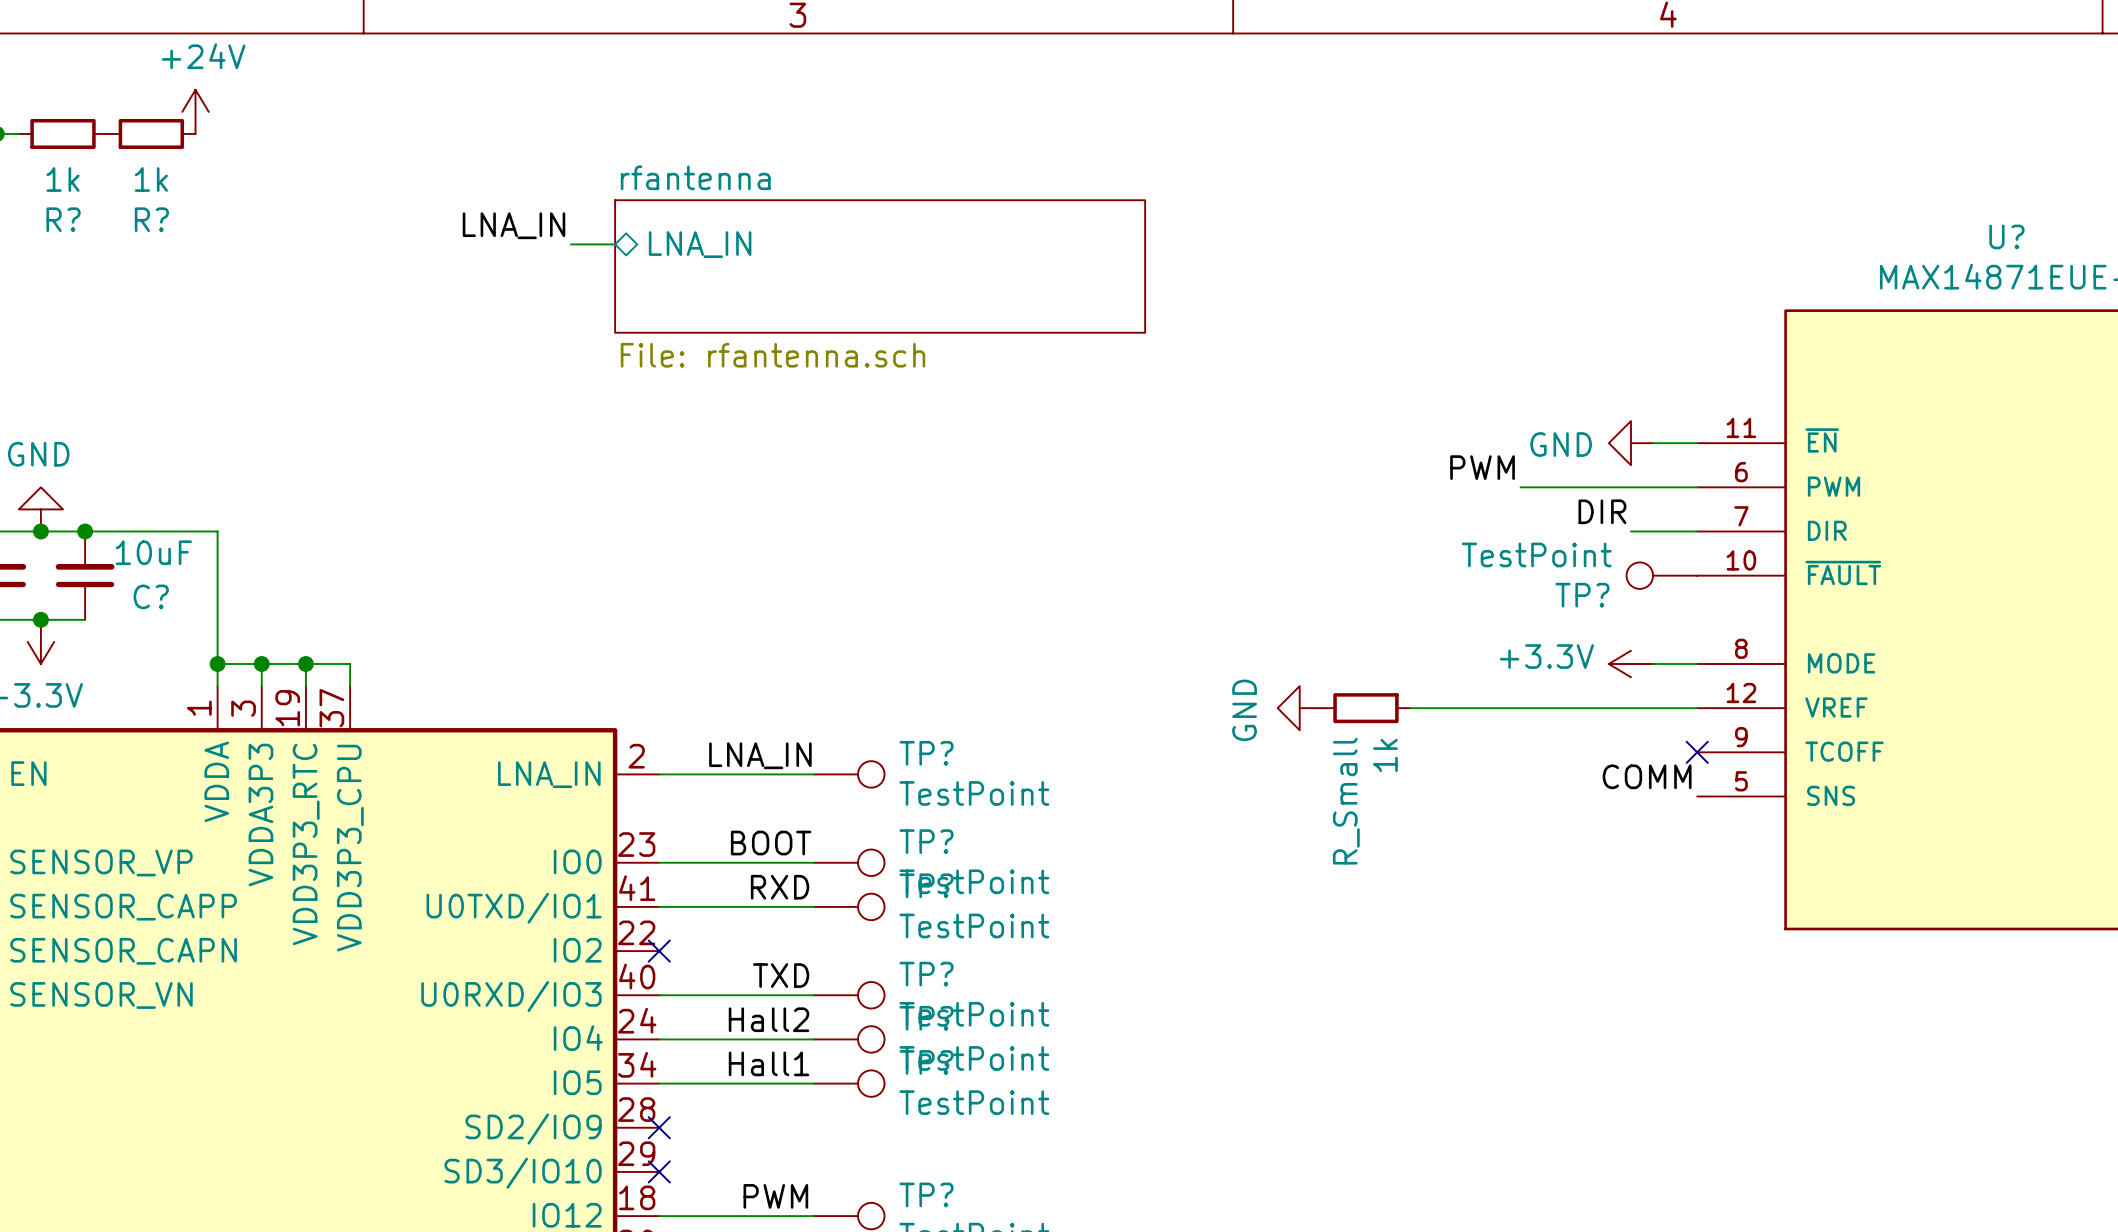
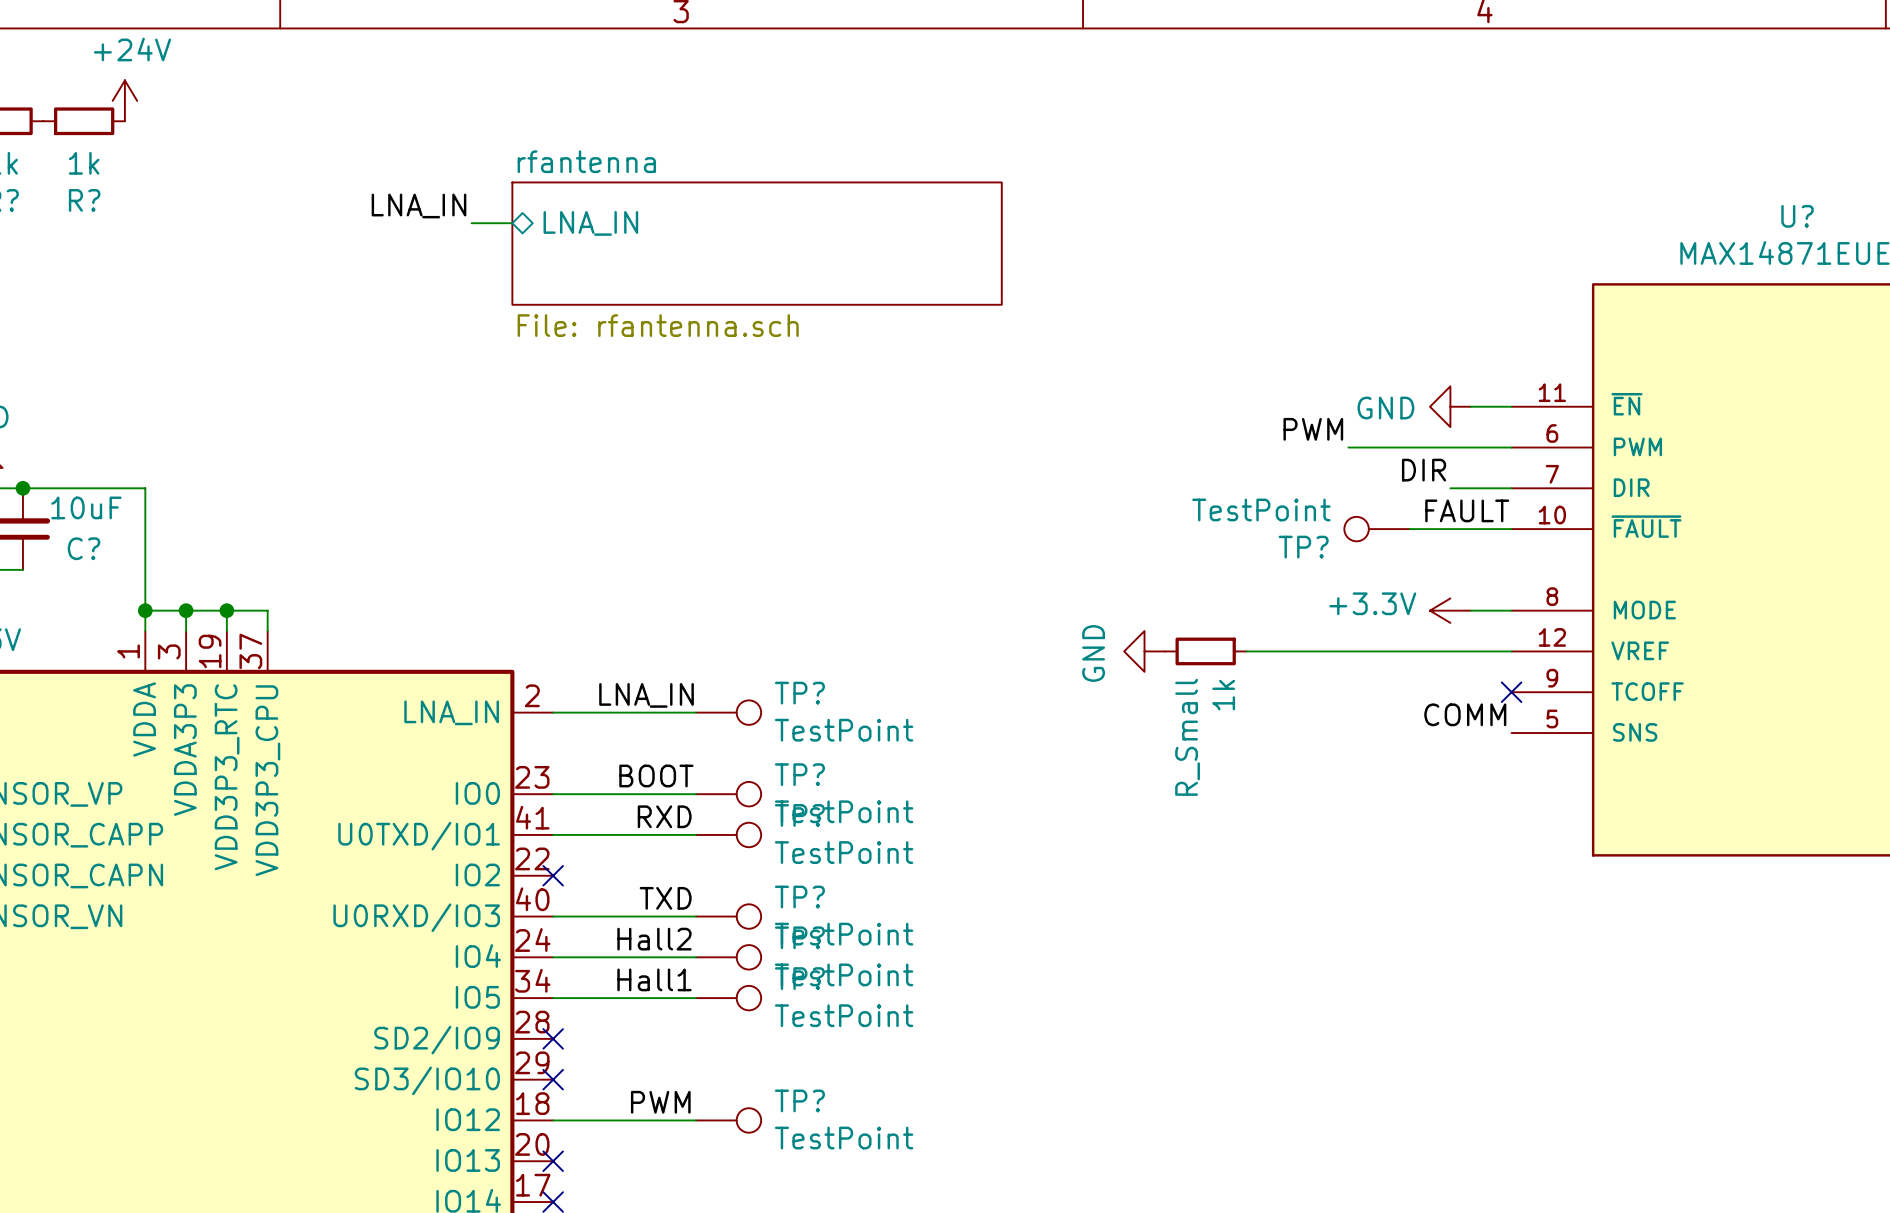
label: none -> FAULT (1467, 510)
wire: none -> (1409, 529) (1511, 529)
TP? position: (1661, 575) -> (1376, 529)

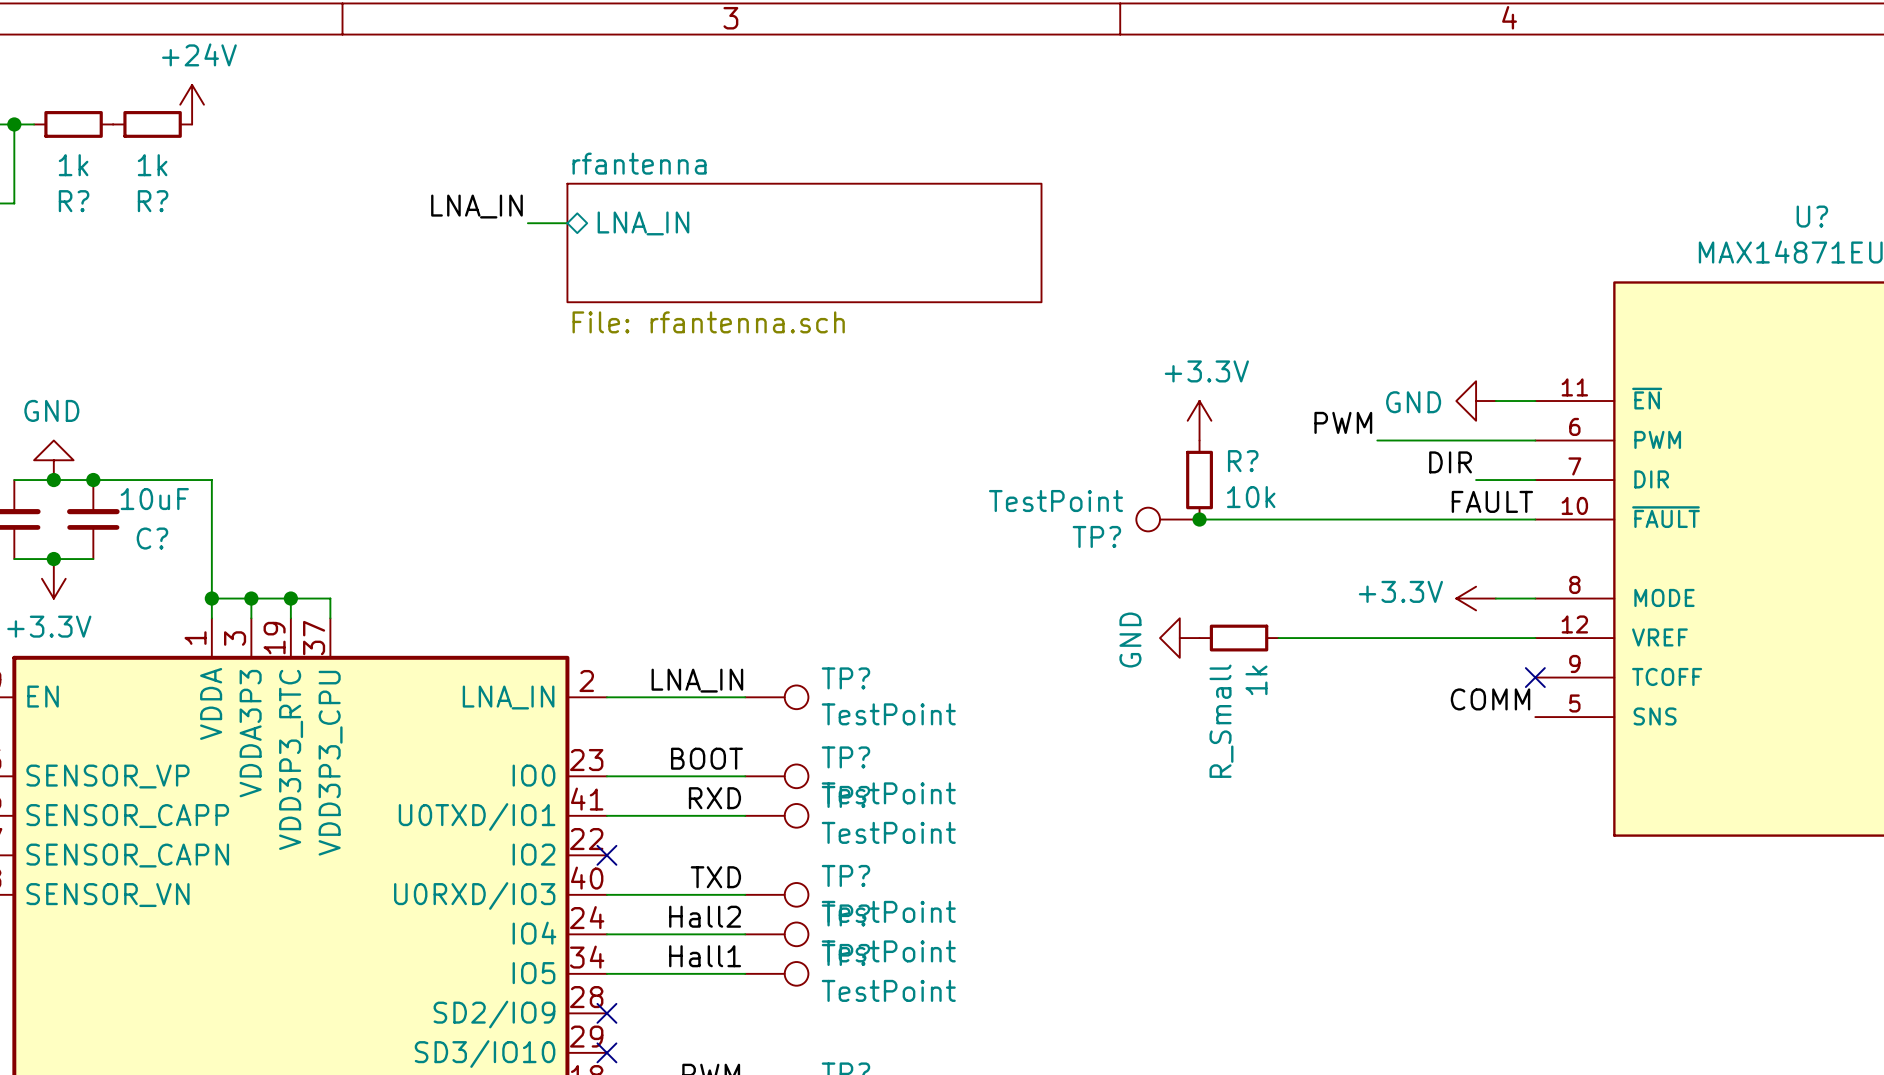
power symbol: none -> +3.3V (1199, 420)
R?: none -> 10k (1199, 480)
wire: none -> (1199, 519) (1436, 519)
junction: none -> (1199, 519)
TP? position: (1376, 529) -> (1167, 519)

